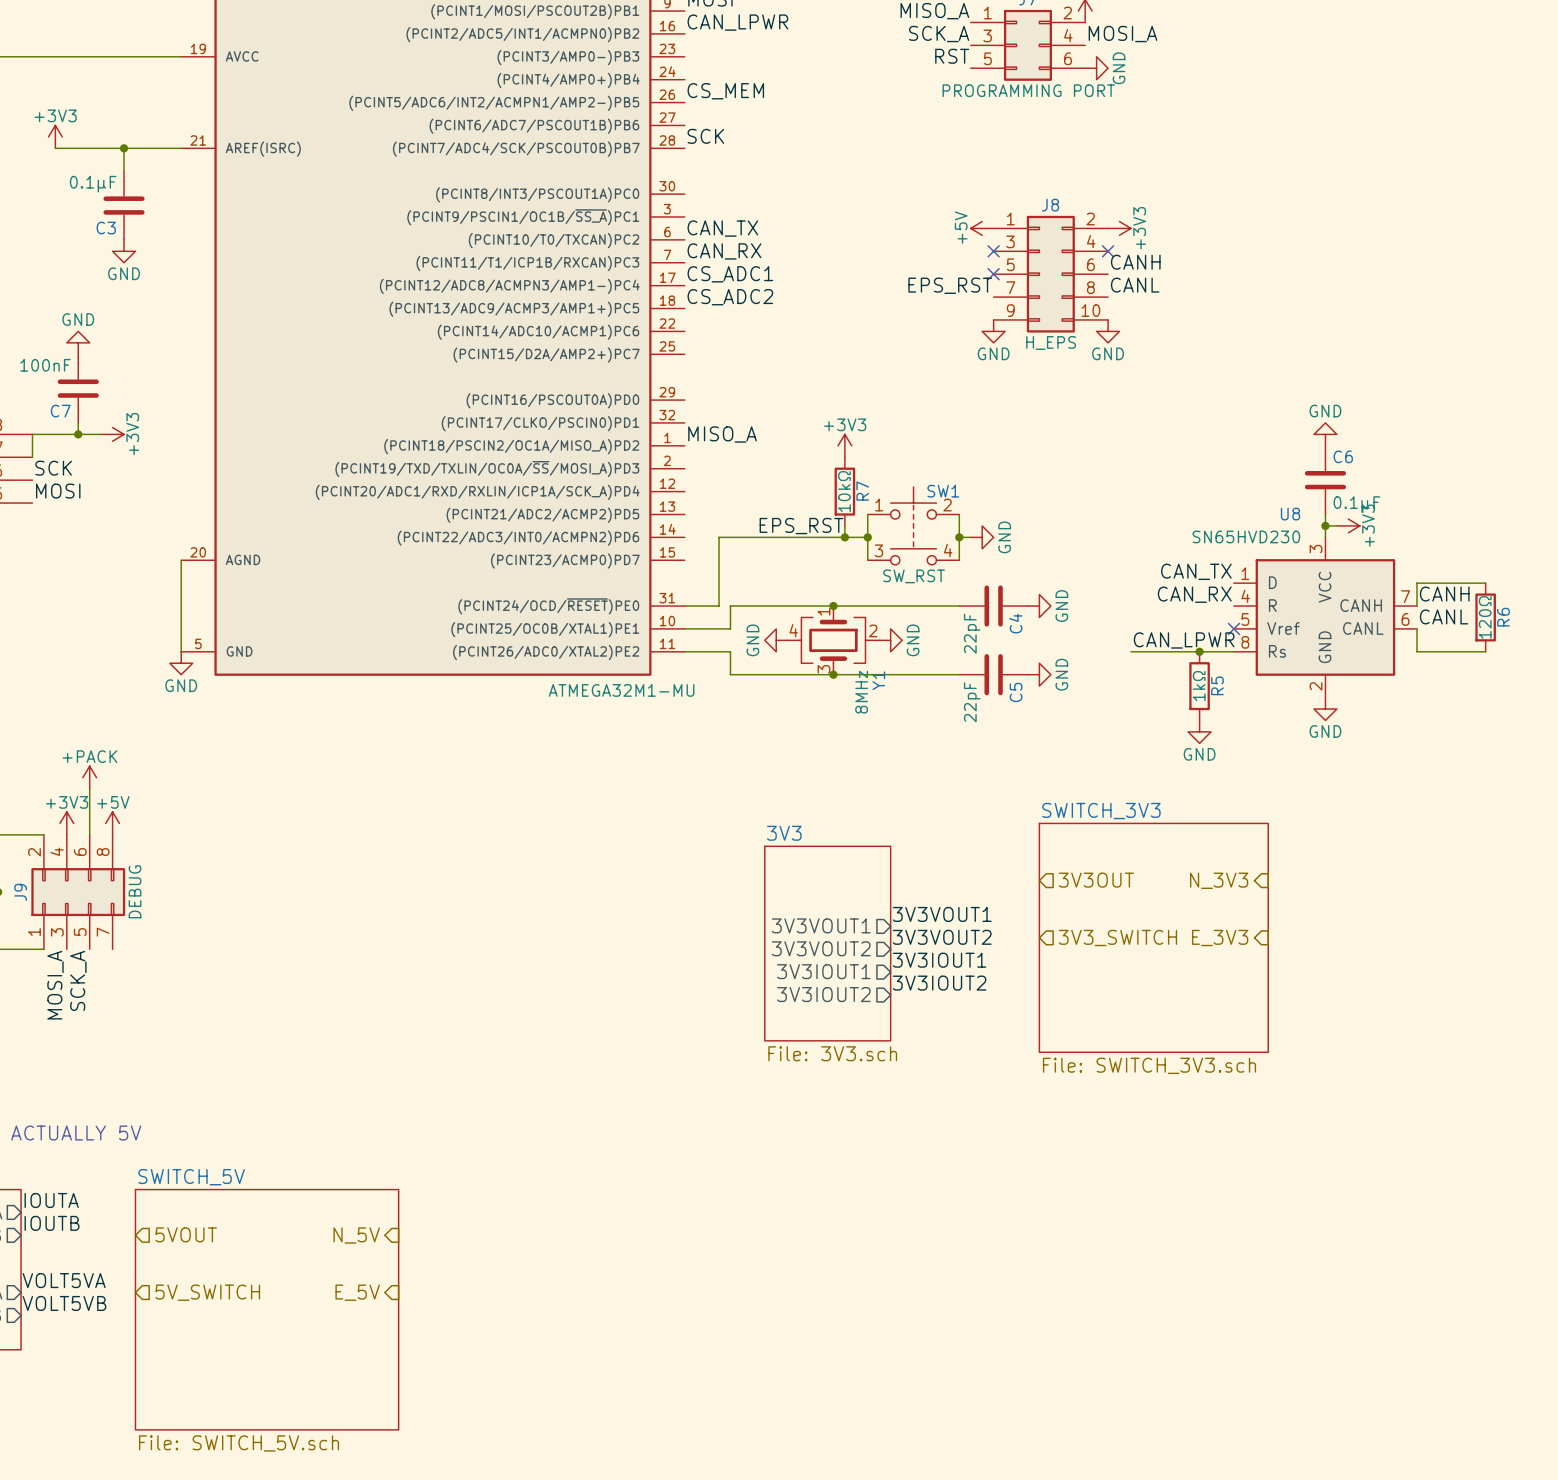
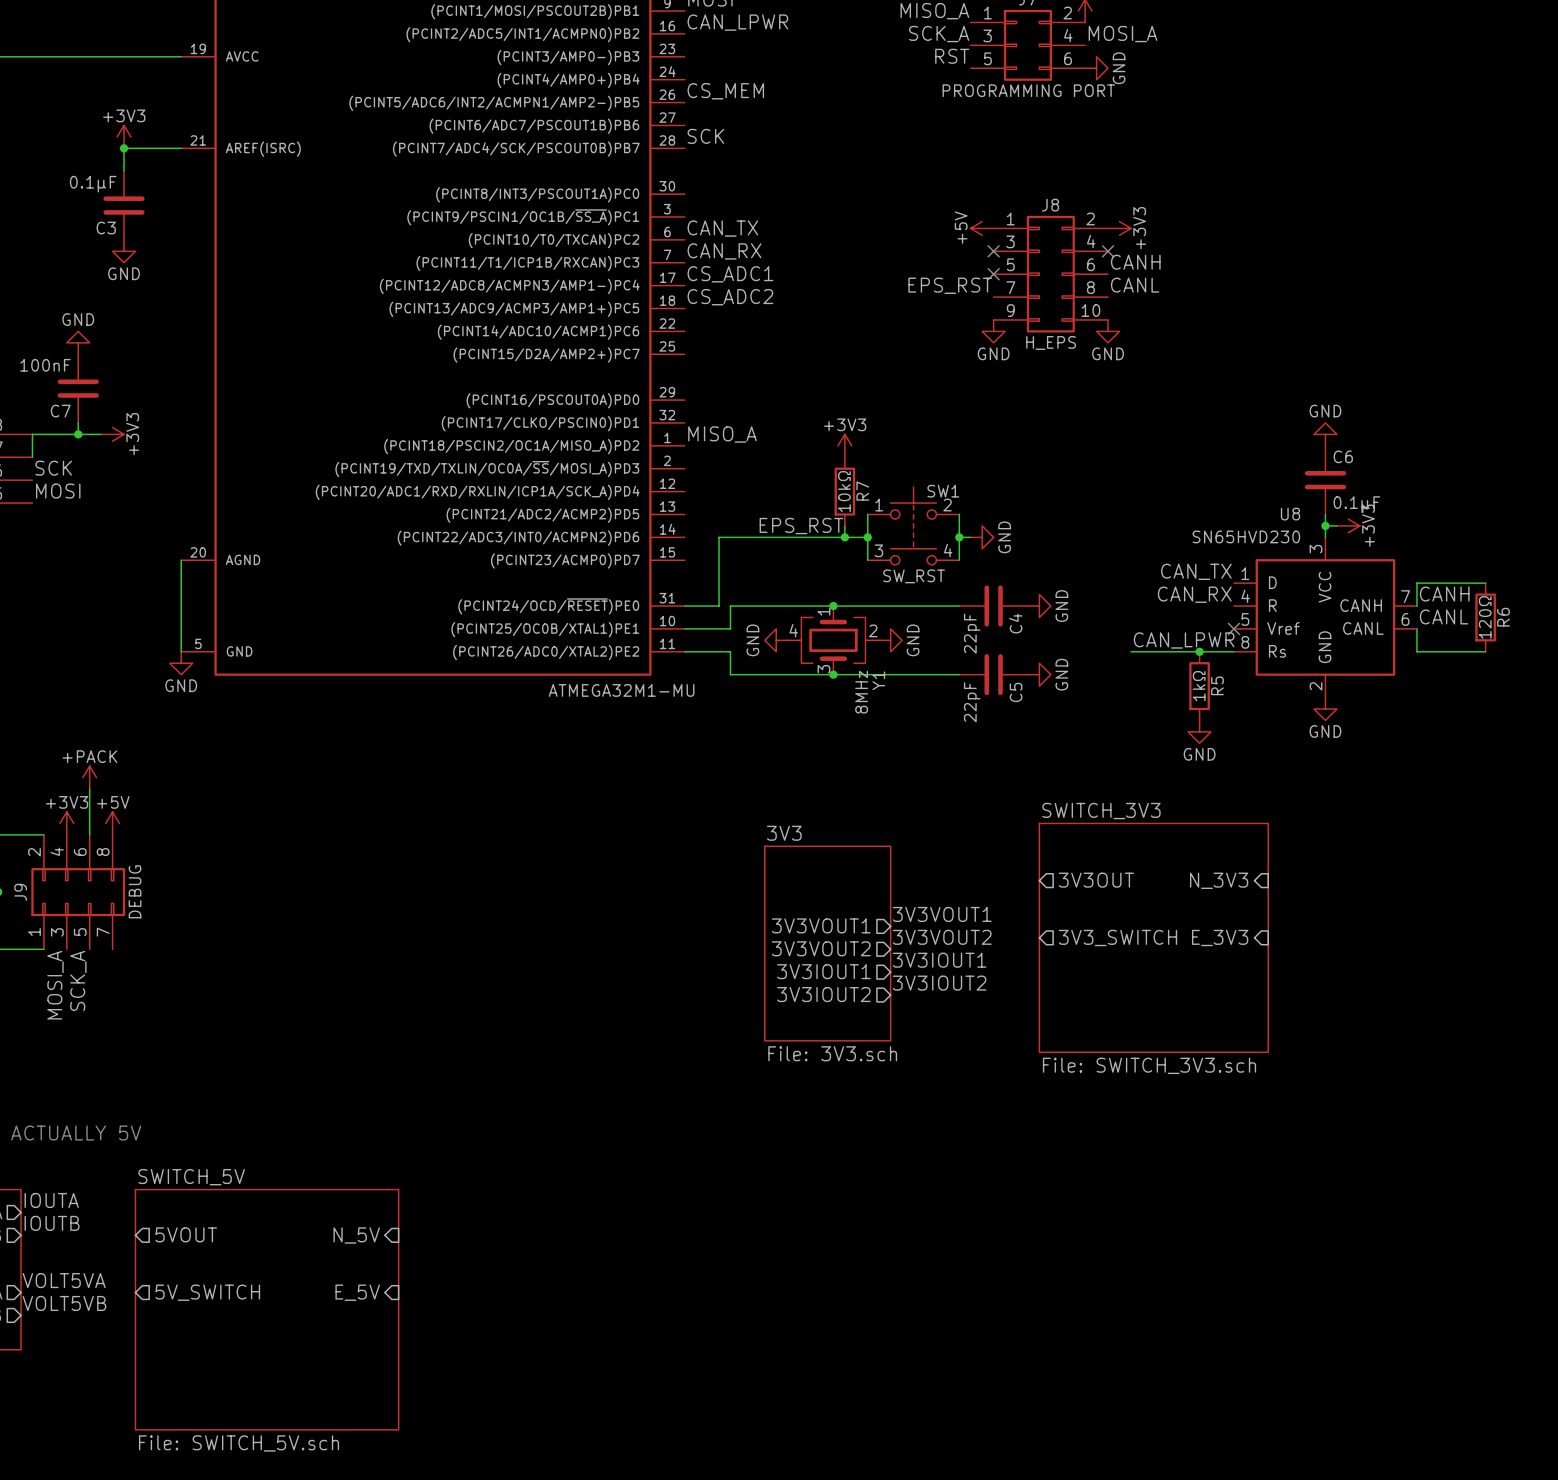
power symbol position: +3V3 (55, 136) -> +3V3 (124, 136)
wire: (55, 148) (124, 148) -> none

